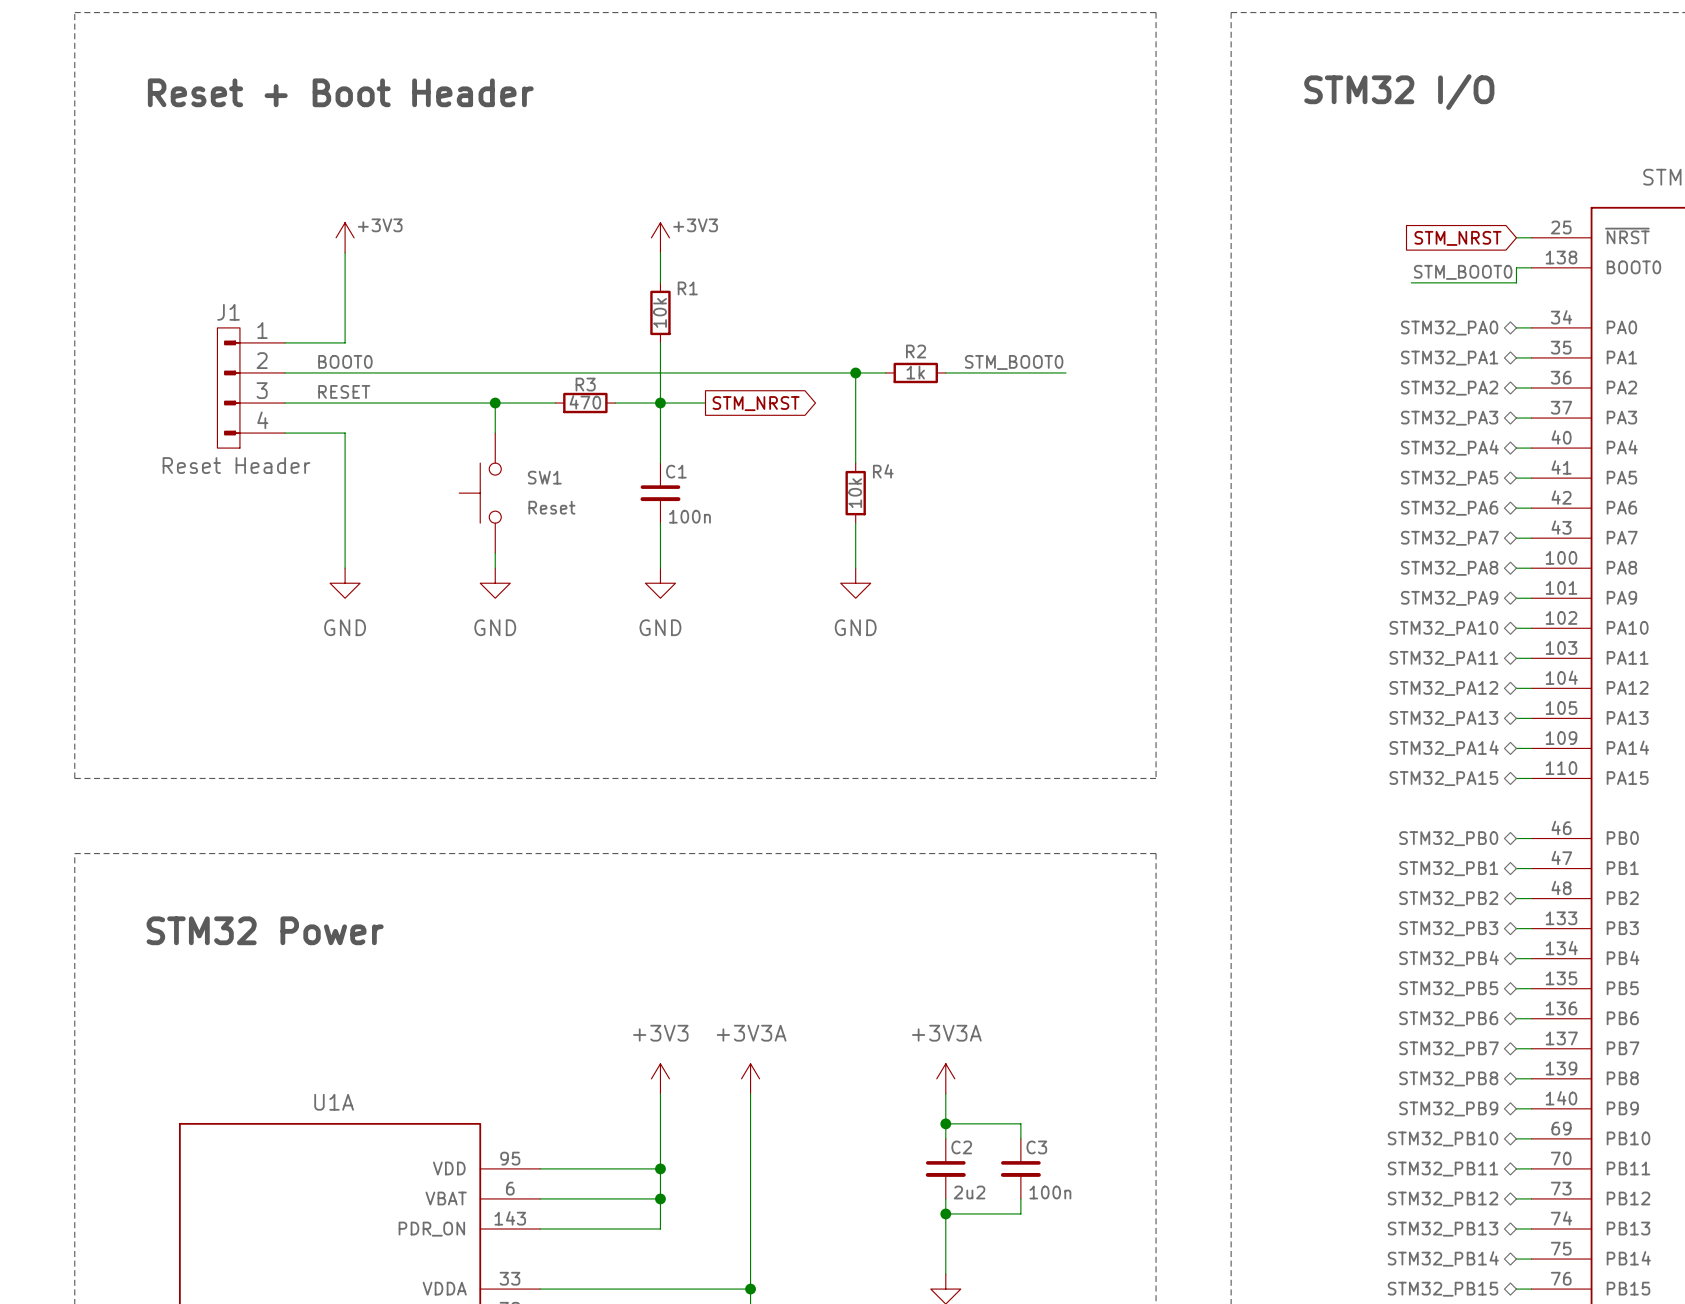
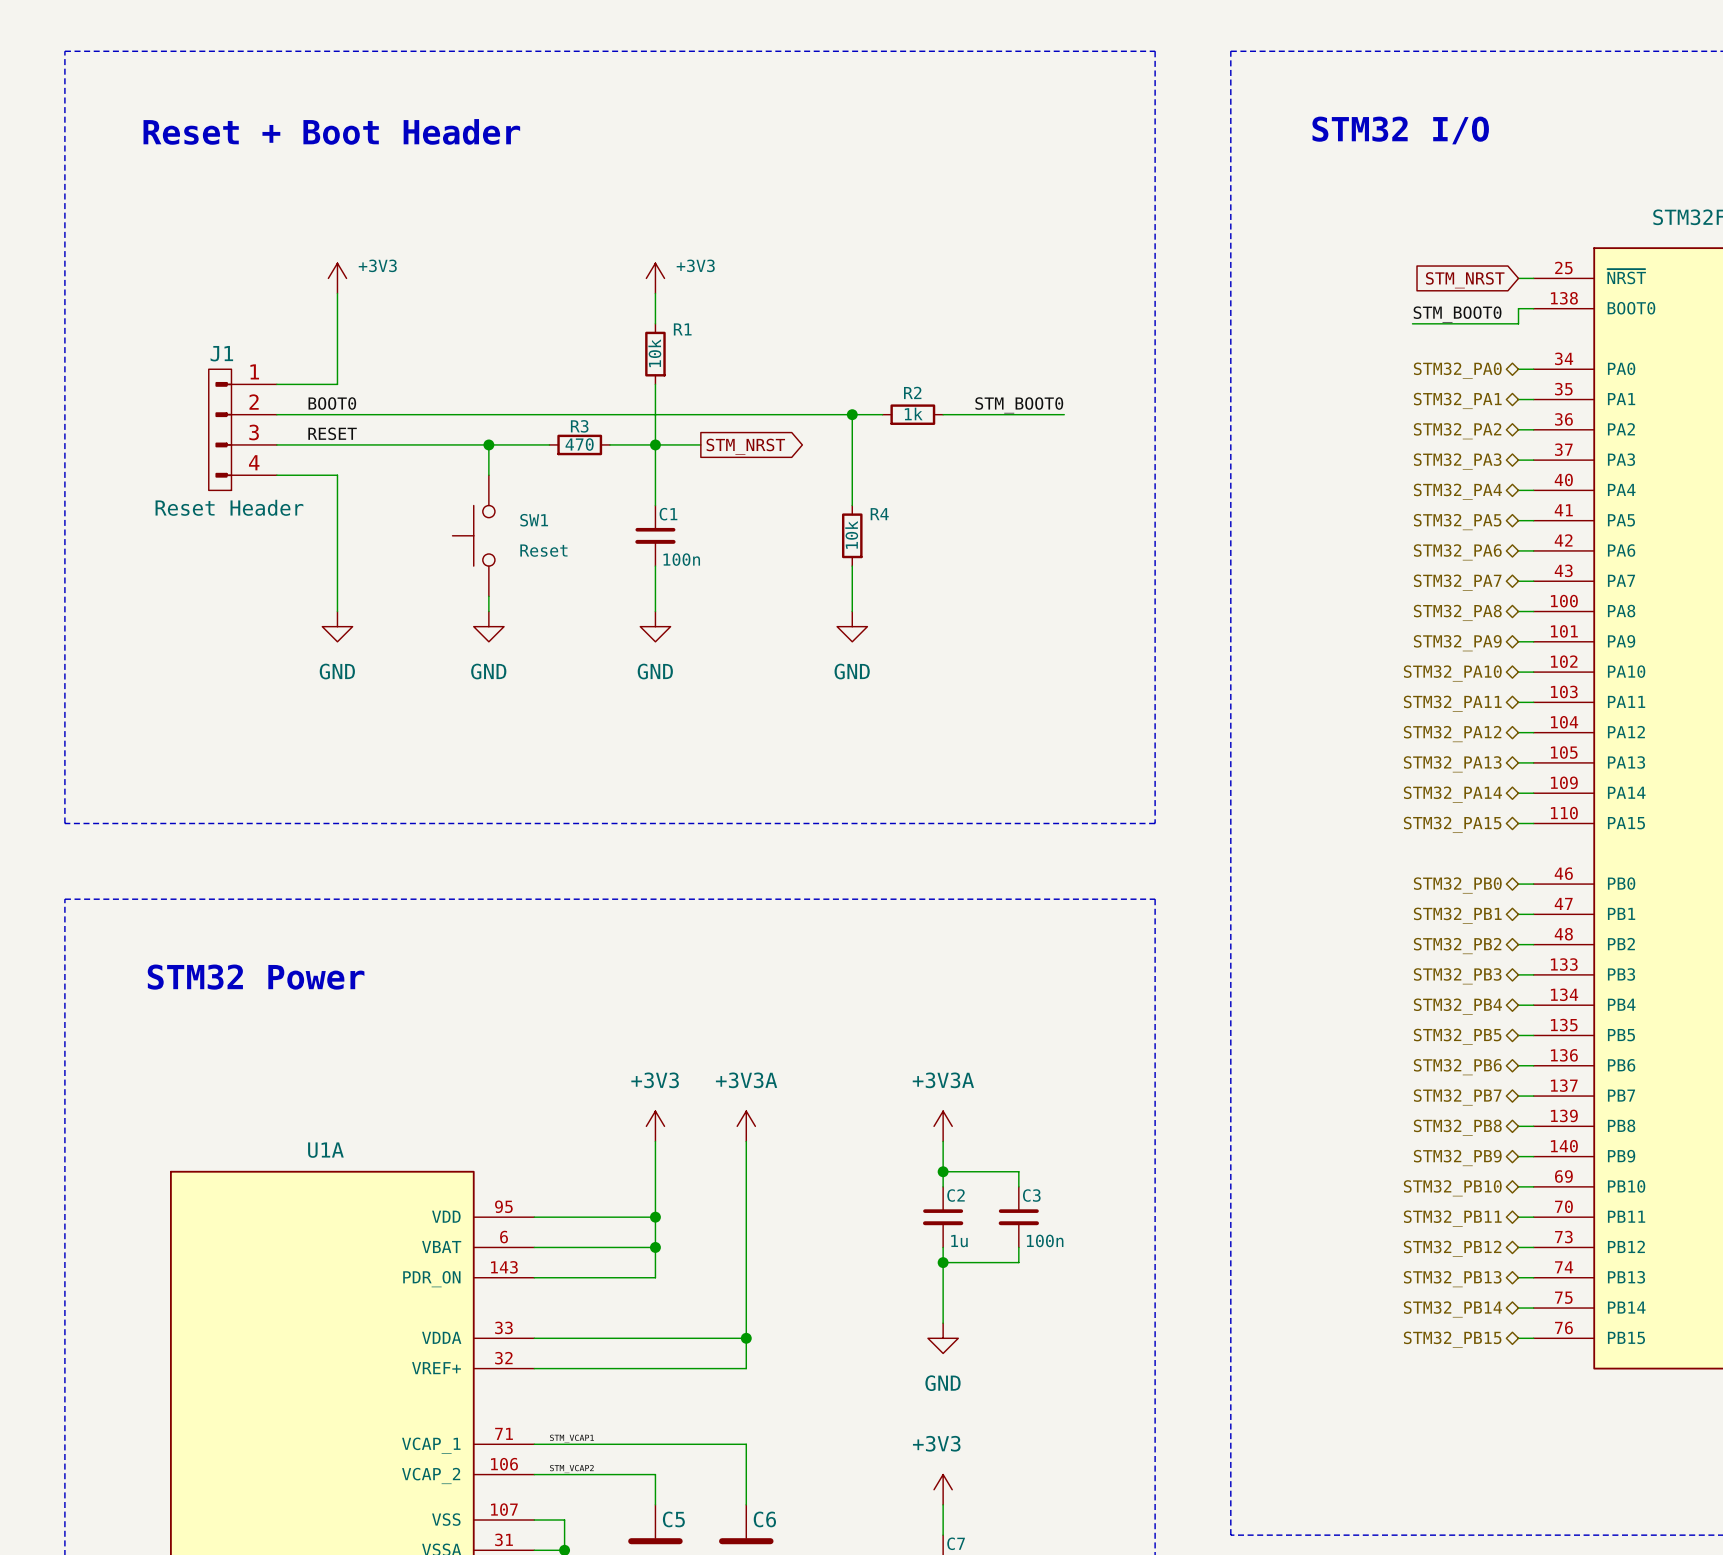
C2 value: 2u2 (969, 1192) -> 1u (959, 1241)

